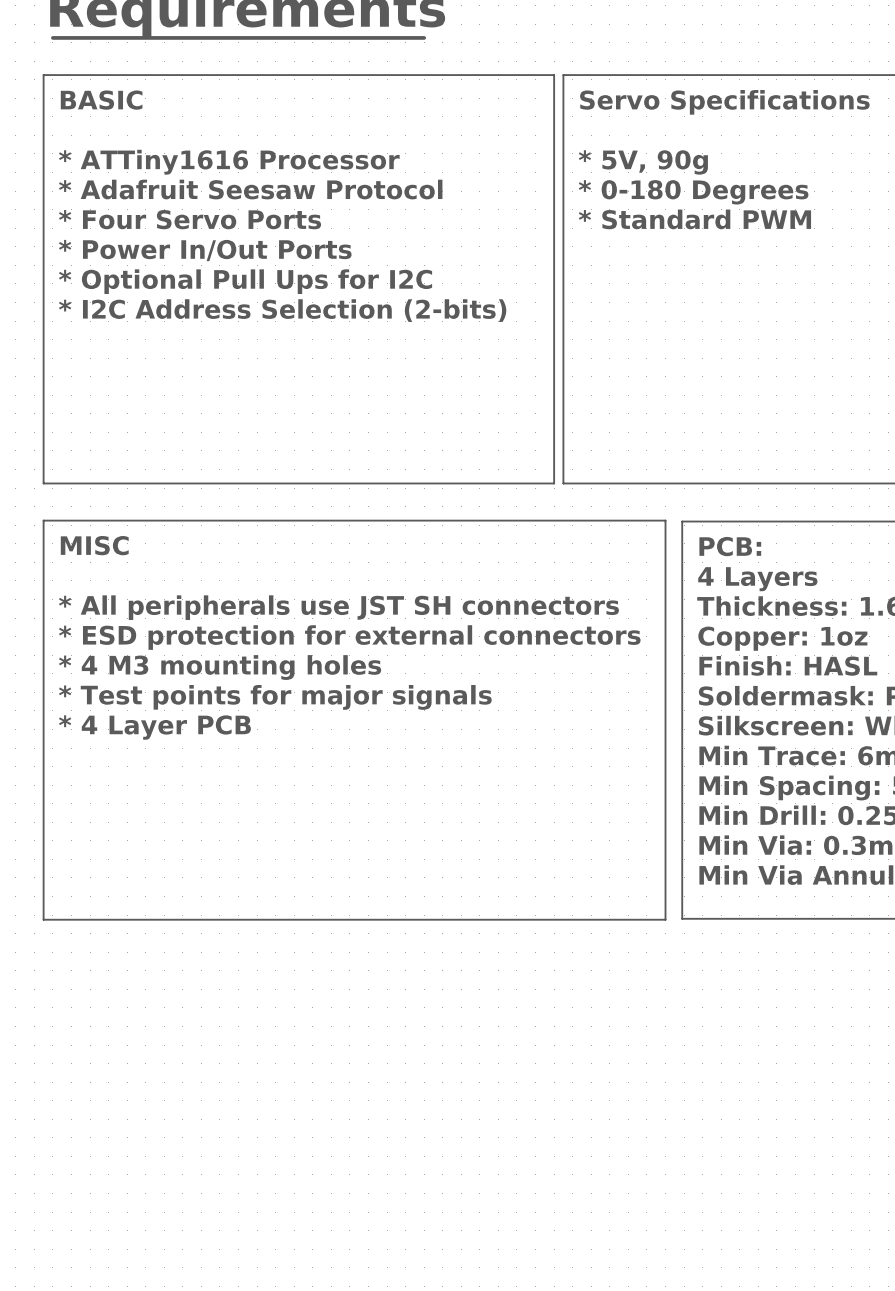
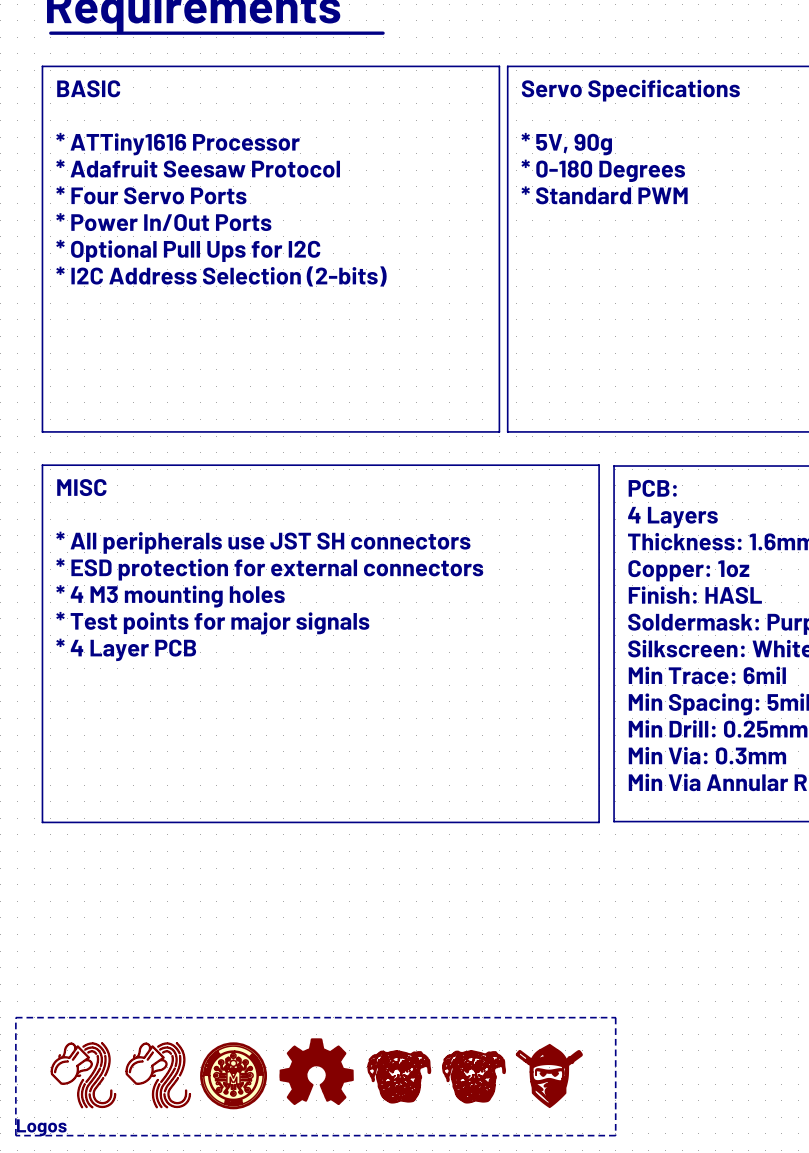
line: none -> (15, 1017) (615, 1017) (615, 1135) (15, 1135) (15, 1017)
part: none -> (316, 1071)
part: none -> (83, 1075)
part: none -> (158, 1075)
part: none -> (233, 1075)
part: none -> (399, 1076)
part: none -> (474, 1076)
part: none -> (549, 1075)
text: none -> Logos (41, 1127)

